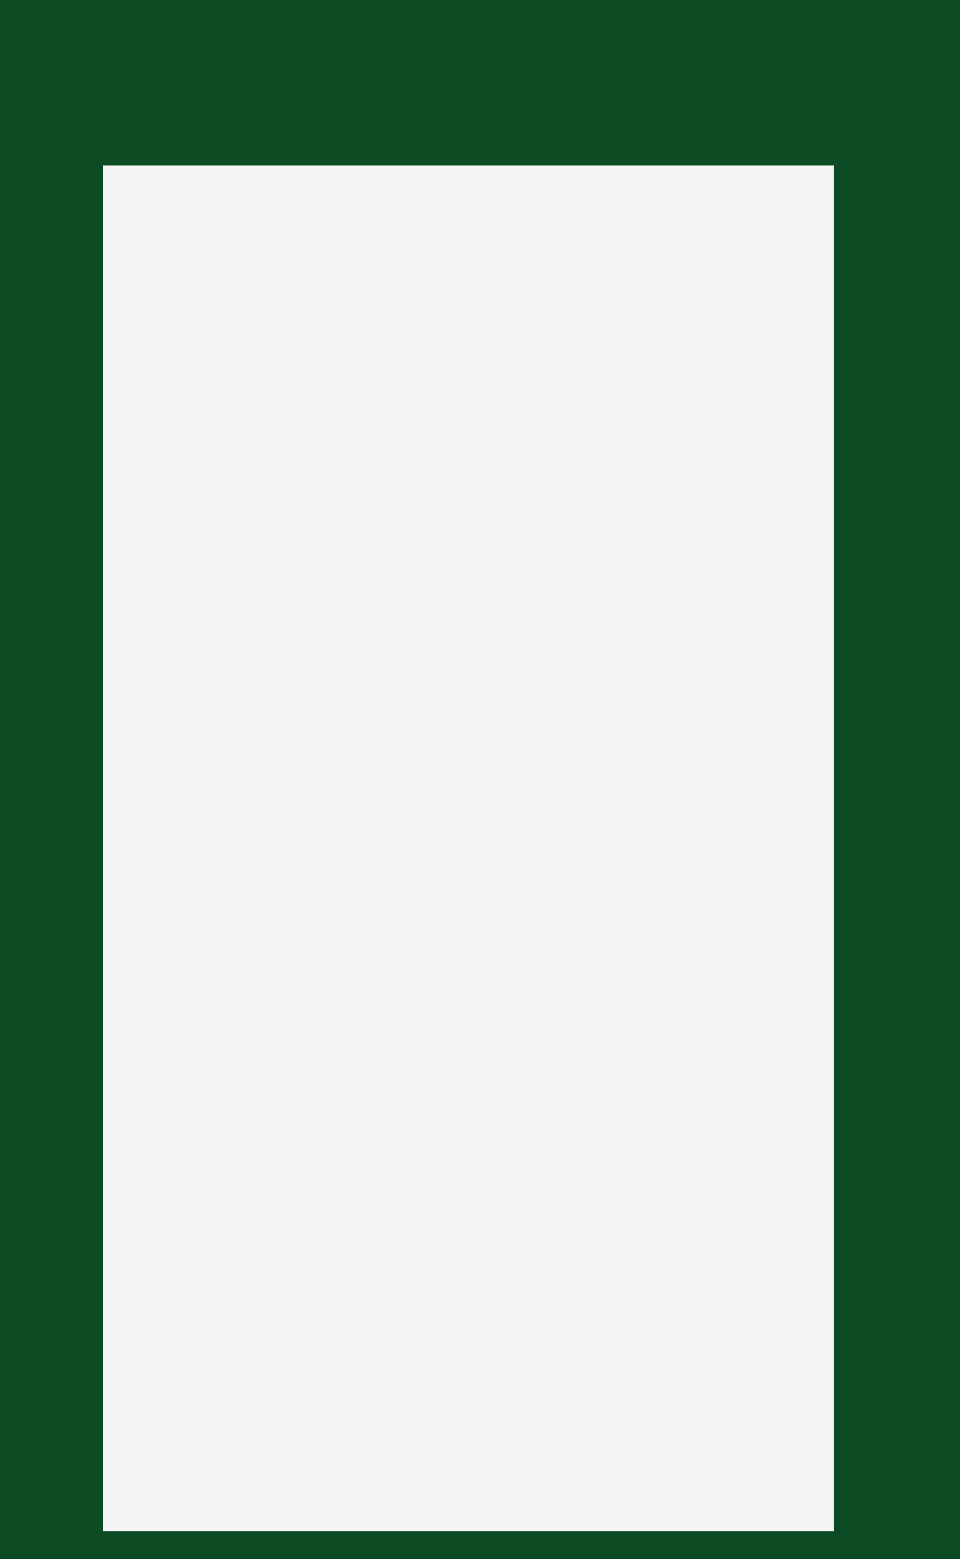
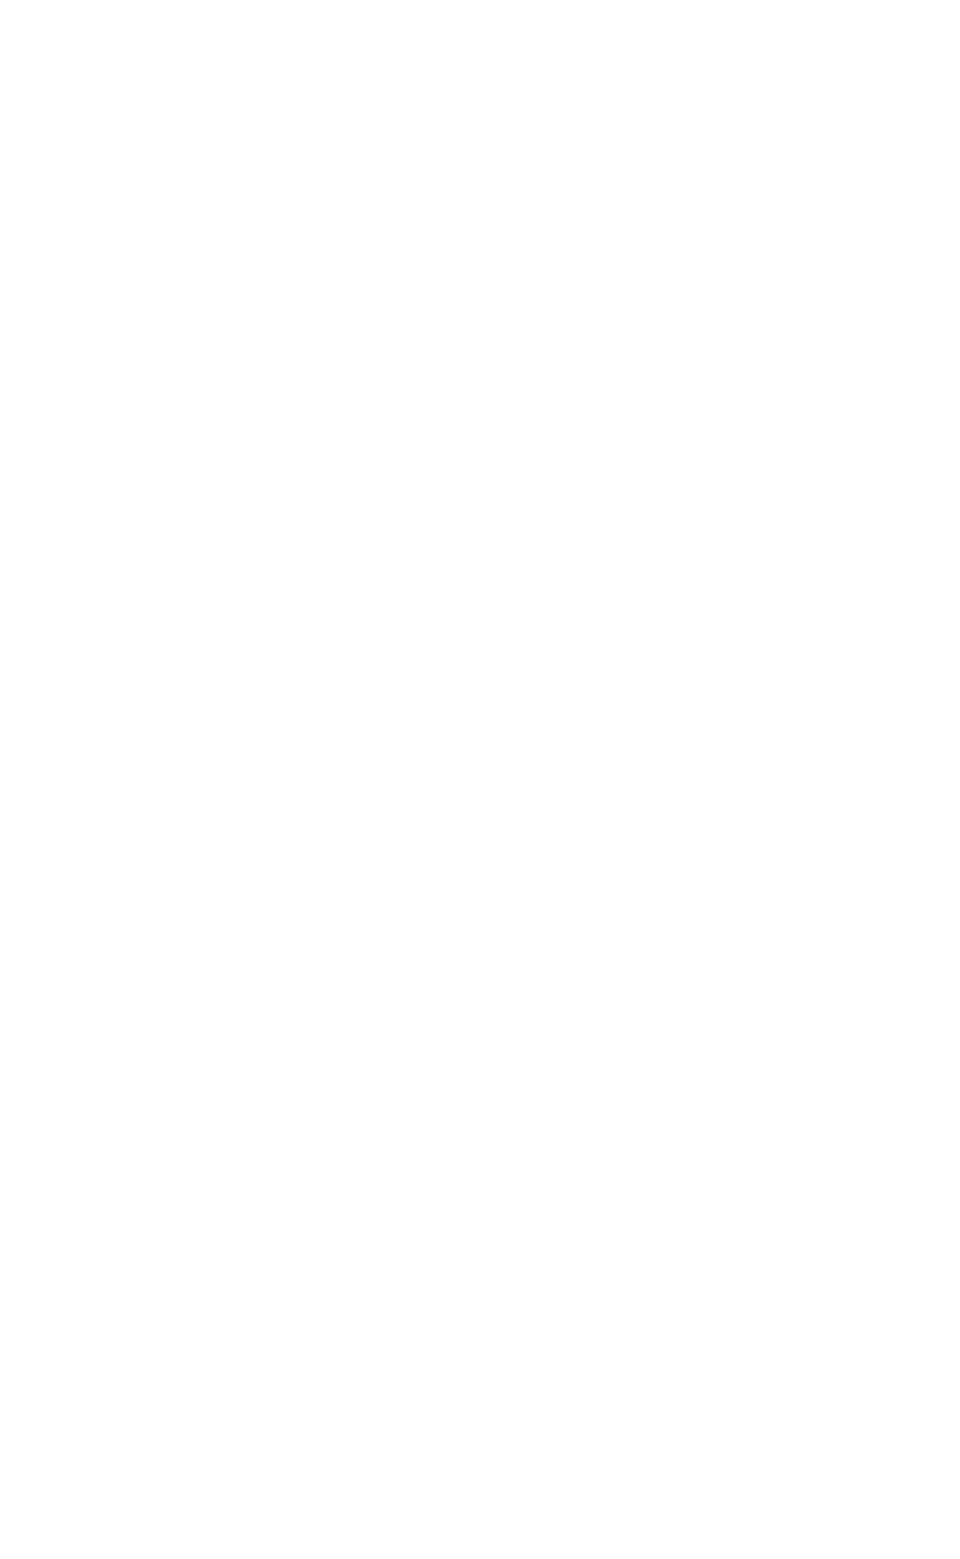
drawing: [103, 165, 834, 1532] -> none

